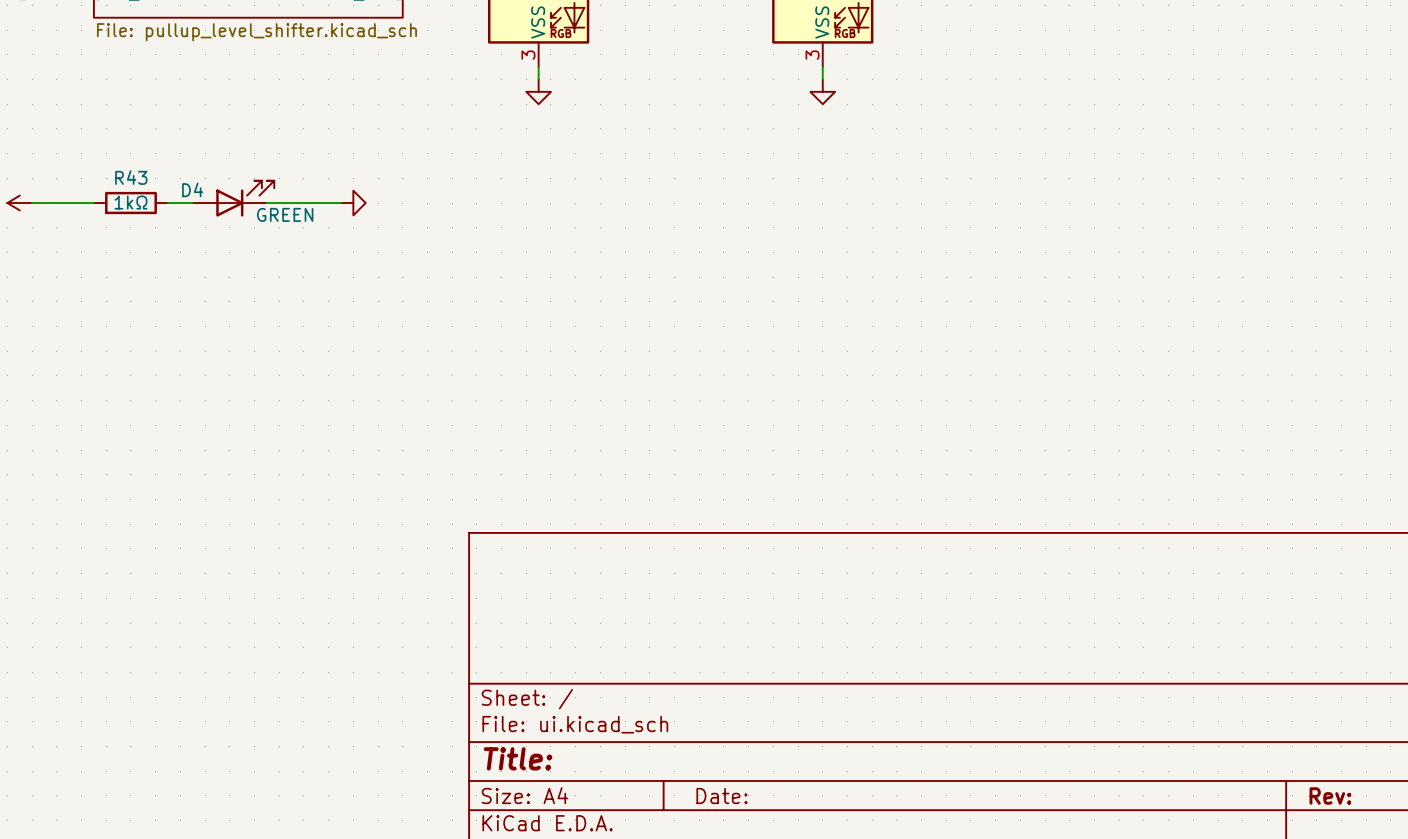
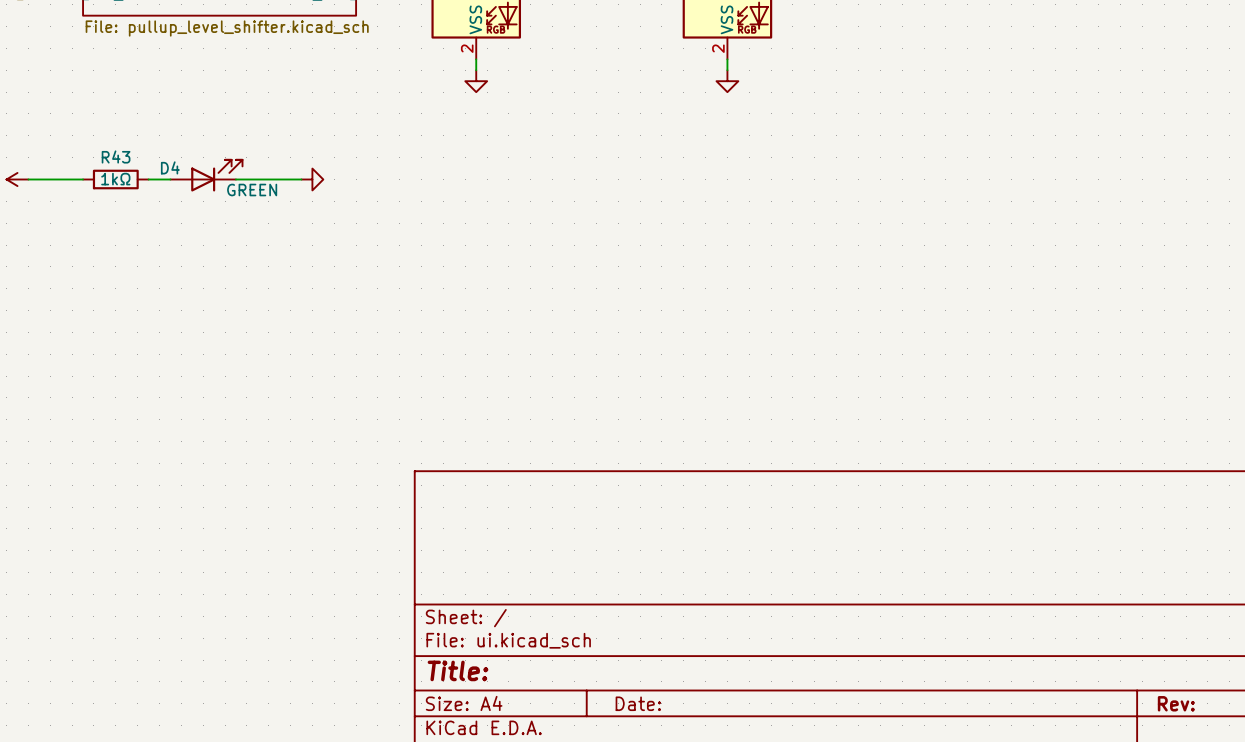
part pin number: 3 (528, 55) -> 2 (467, 48)
part pin number: 3 (812, 55) -> 2 (718, 48)

